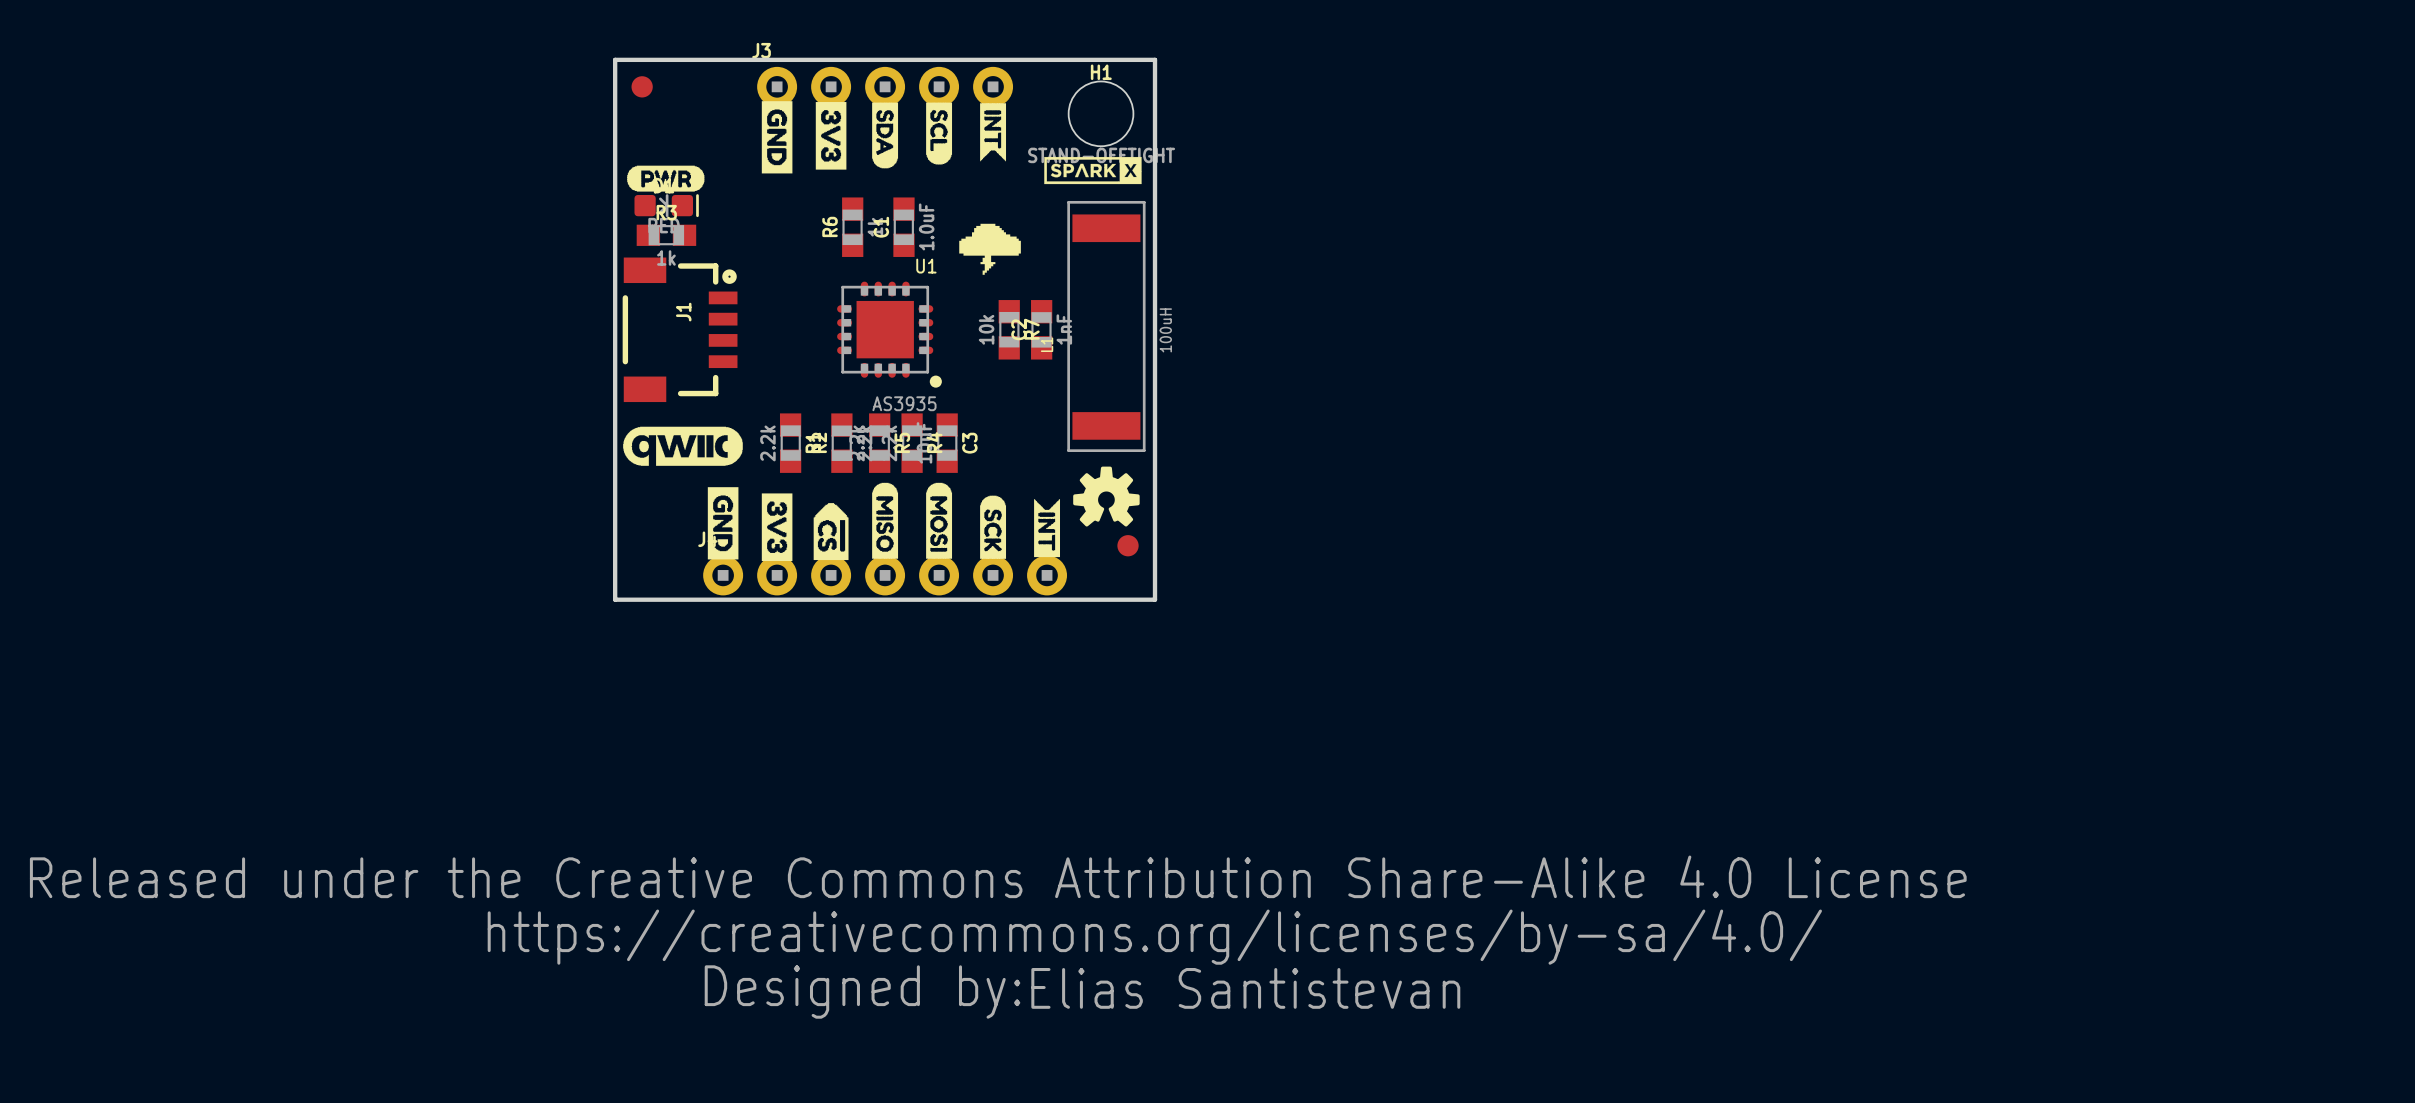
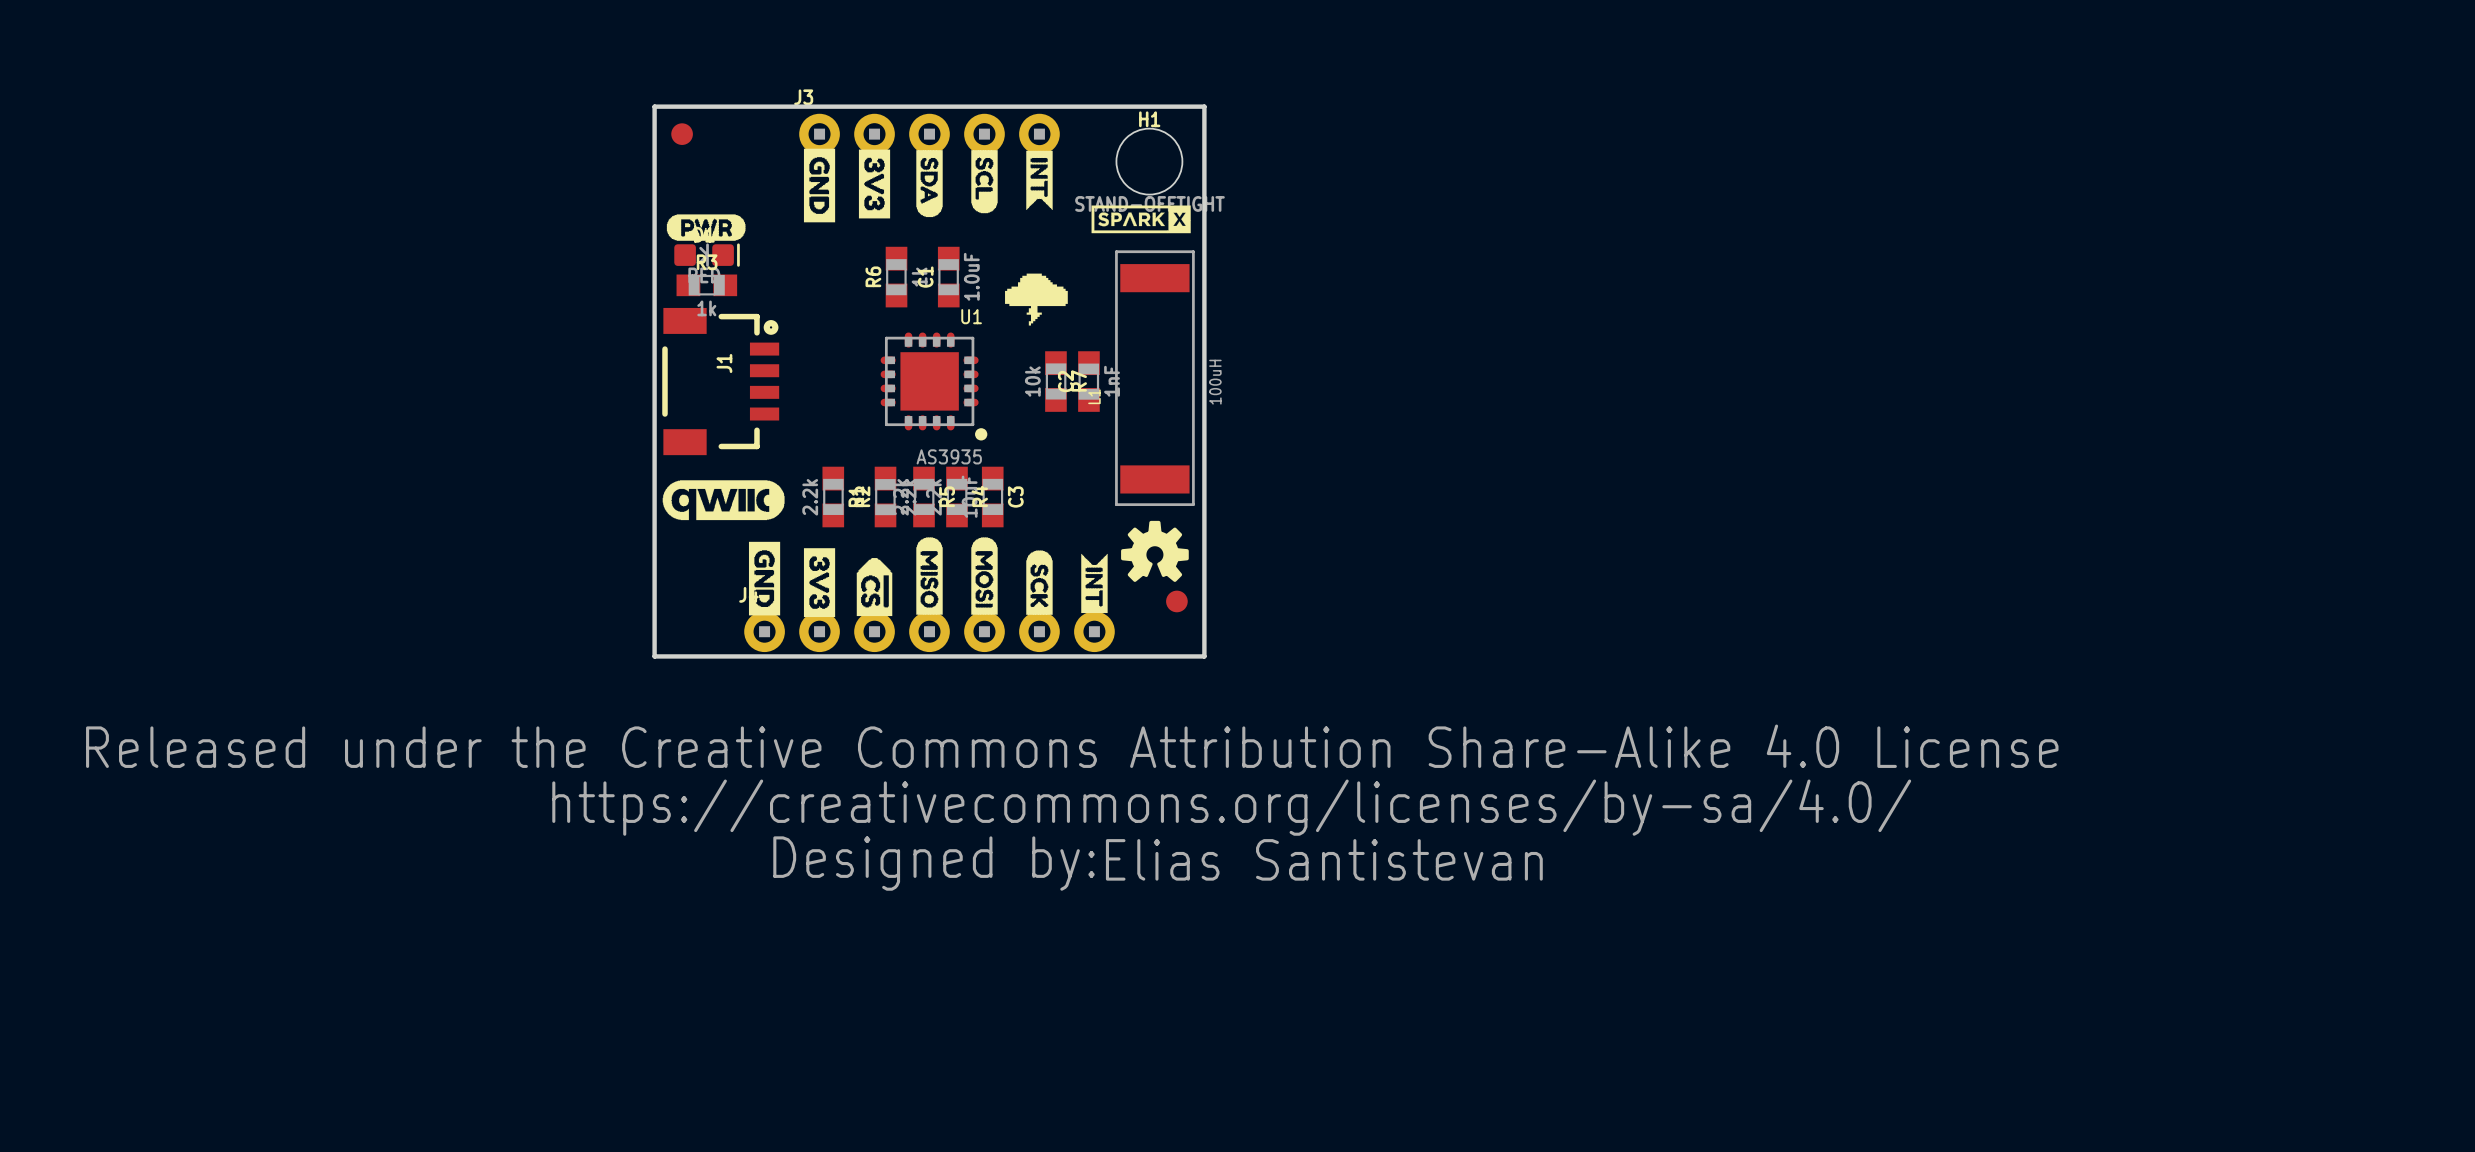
drawing position: (998, 937) -> (1072, 807)
text position: Elias Santistevan (1245, 988) -> Elias Santistevan (1324, 859)

